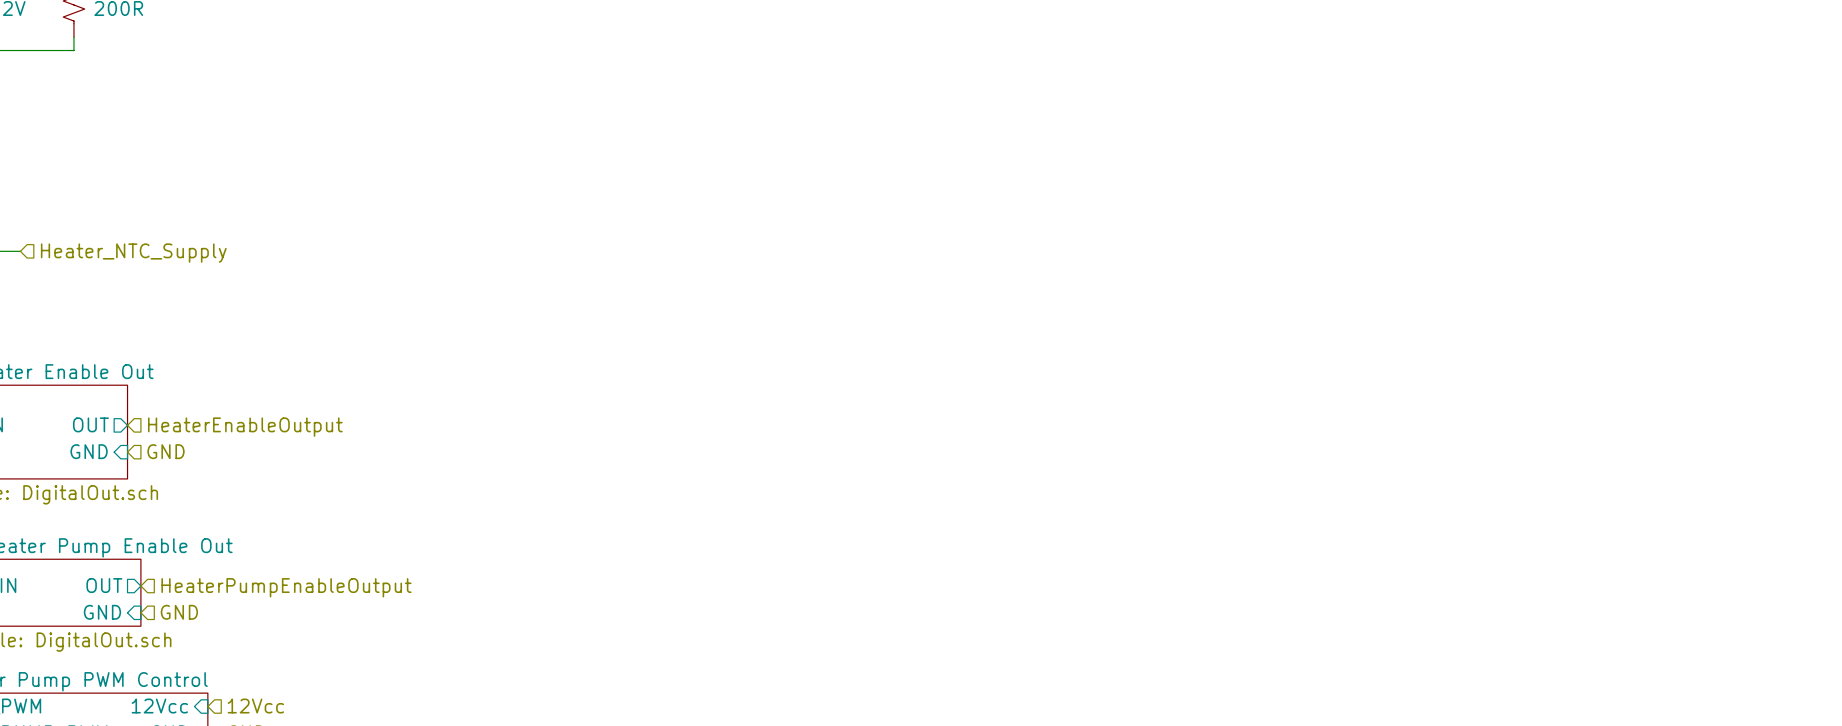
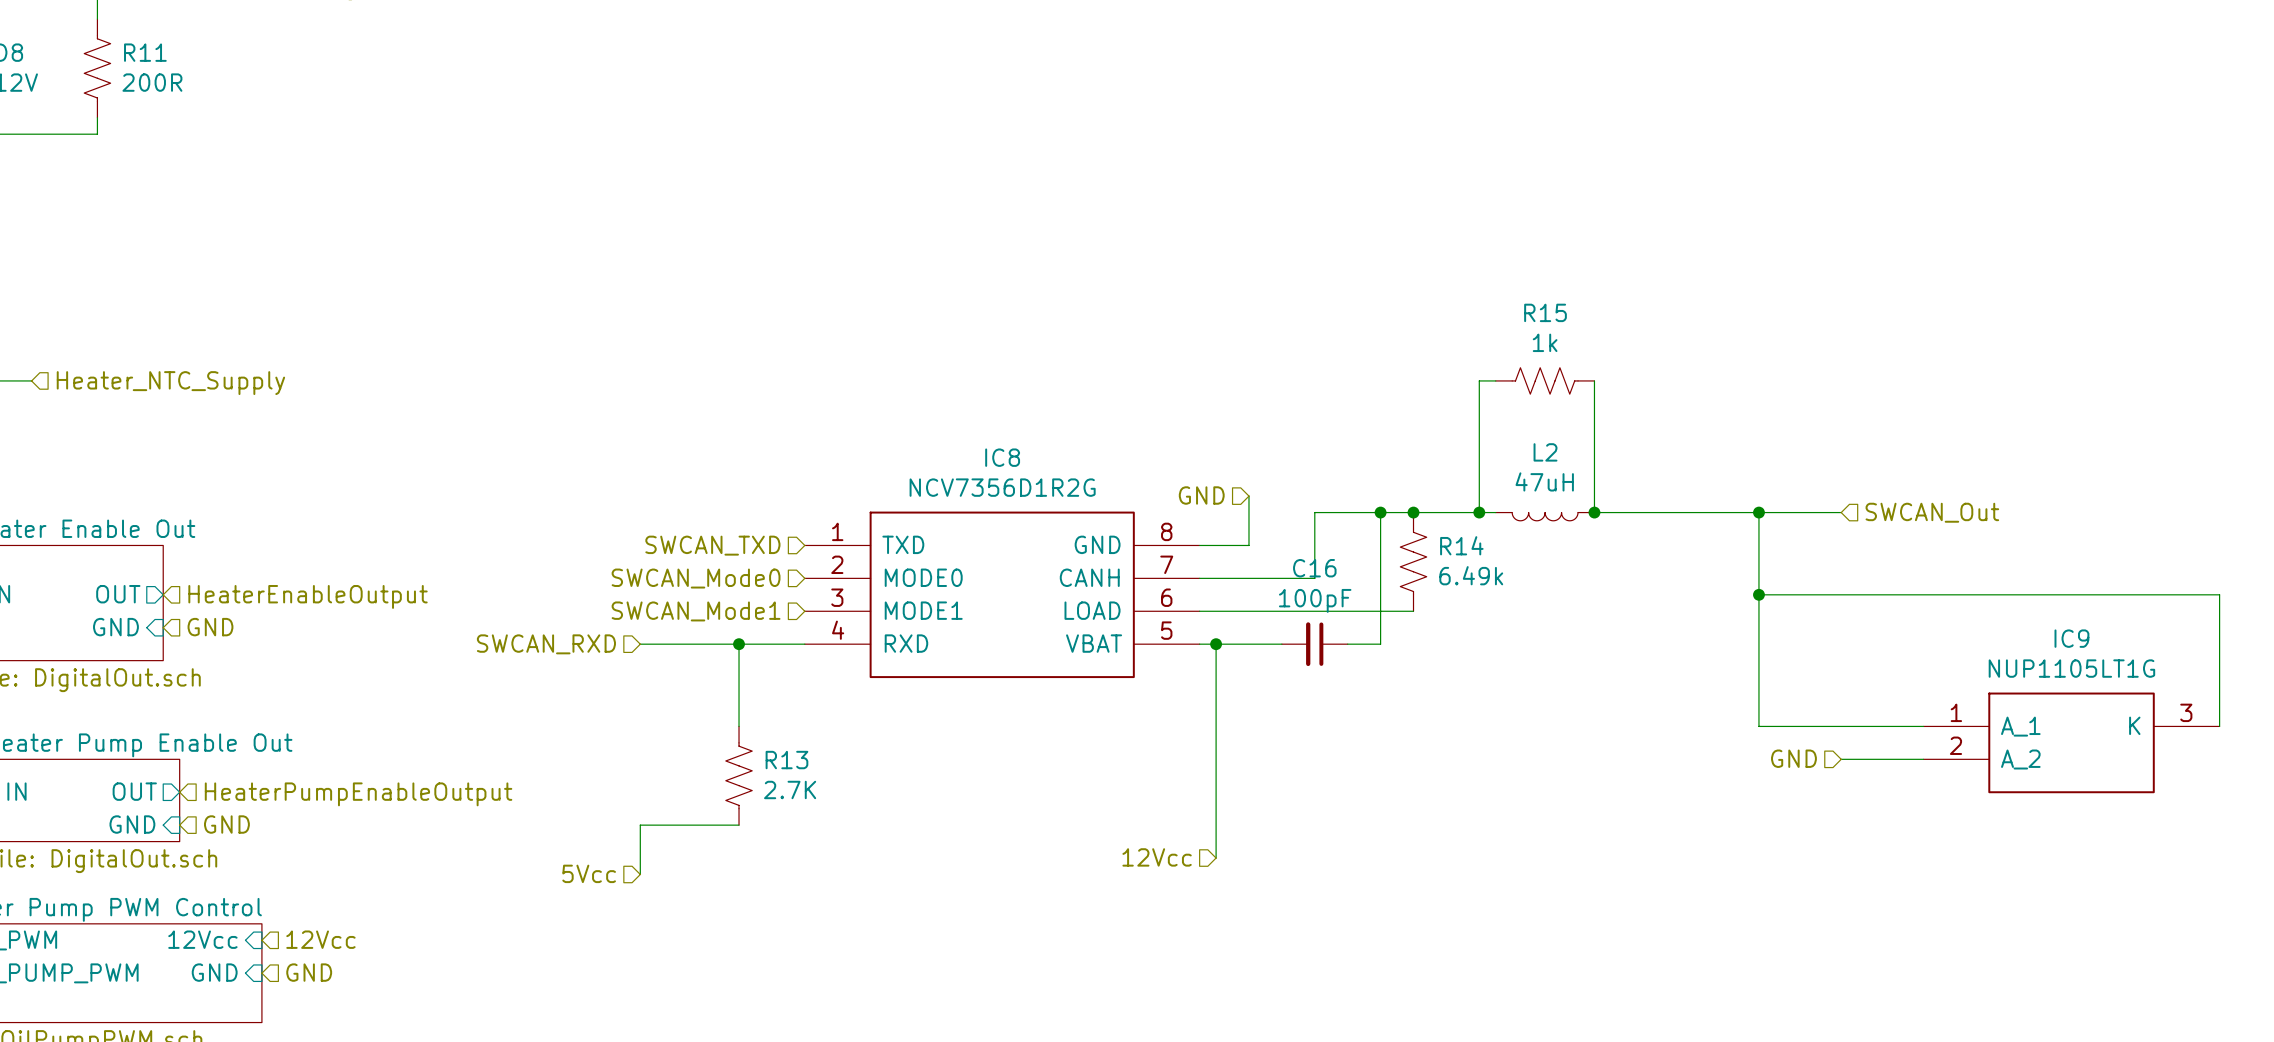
wire: none -> (1495, 380) (1479, 380) (1479, 512)
R15: none -> 1k (1545, 380)
wire: none -> (1594, 380) (1594, 512) (1841, 512)
hierarchical label: none -> GND (1201, 495)
wire: none -> (1248, 496) (1248, 545) (1199, 545)
wire: none -> (1380, 512) (1380, 644) (1347, 644)
junction: none -> (1380, 512)
junction: none -> (1413, 512)
junction: none -> (1479, 512)
wire: none -> (1495, 512) (1314, 512) (1314, 578) (1199, 578)
junction: none -> (1594, 512)
wire: none -> (1758, 512) (1758, 726) (1923, 726)
junction: none -> (1758, 512)
hierarchical label: none -> SWCAN_Out (1932, 512)
L2: none -> 47uH (1545, 516)
hierarchical label: none -> SWCAN_TXD (712, 545)
R14: none -> 6.49k (1413, 561)
hierarchical label: none -> SWCAN_Mode0 (696, 578)
IC8: none -> NCV7356D1R2G (1002, 594)
wire: none -> (1758, 594) (2219, 594) (2219, 726)
junction: none -> (1758, 594)
hierarchical label: none -> SWCAN_Mode1 (696, 611)
wire: none -> (1199, 611) (1413, 611)
hierarchical label: none -> SWCAN_RXD (546, 644)
wire: none -> (640, 644) (804, 644)
wire: none -> (739, 644) (739, 726)
junction: none -> (739, 644)
wire: none -> (1199, 644) (1281, 644)
wire: none -> (1216, 644) (1216, 858)
junction: none -> (1216, 644)
C16: none -> 100pF (1314, 644)
IC9: none -> NUP1105LT1G (2071, 742)
hierarchical label: none -> GND (1793, 758)
wire: none -> (1841, 759) (1923, 759)
R13: none -> 2.7K (739, 775)
wire: none -> (739, 825) (640, 825) (640, 874)
hierarchical label: none -> 12Vcc (1157, 857)
hierarchical label: none -> 5Vcc (589, 873)

